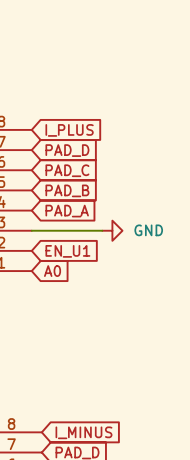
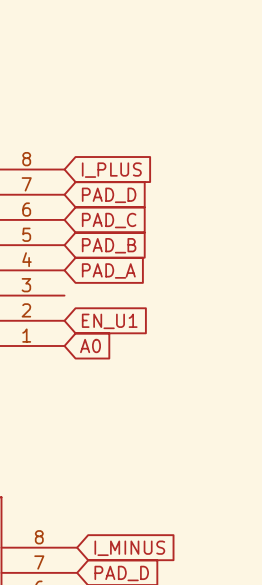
wire: (31, 230) (102, 230) -> none
power symbol: GND (112, 230) -> none

